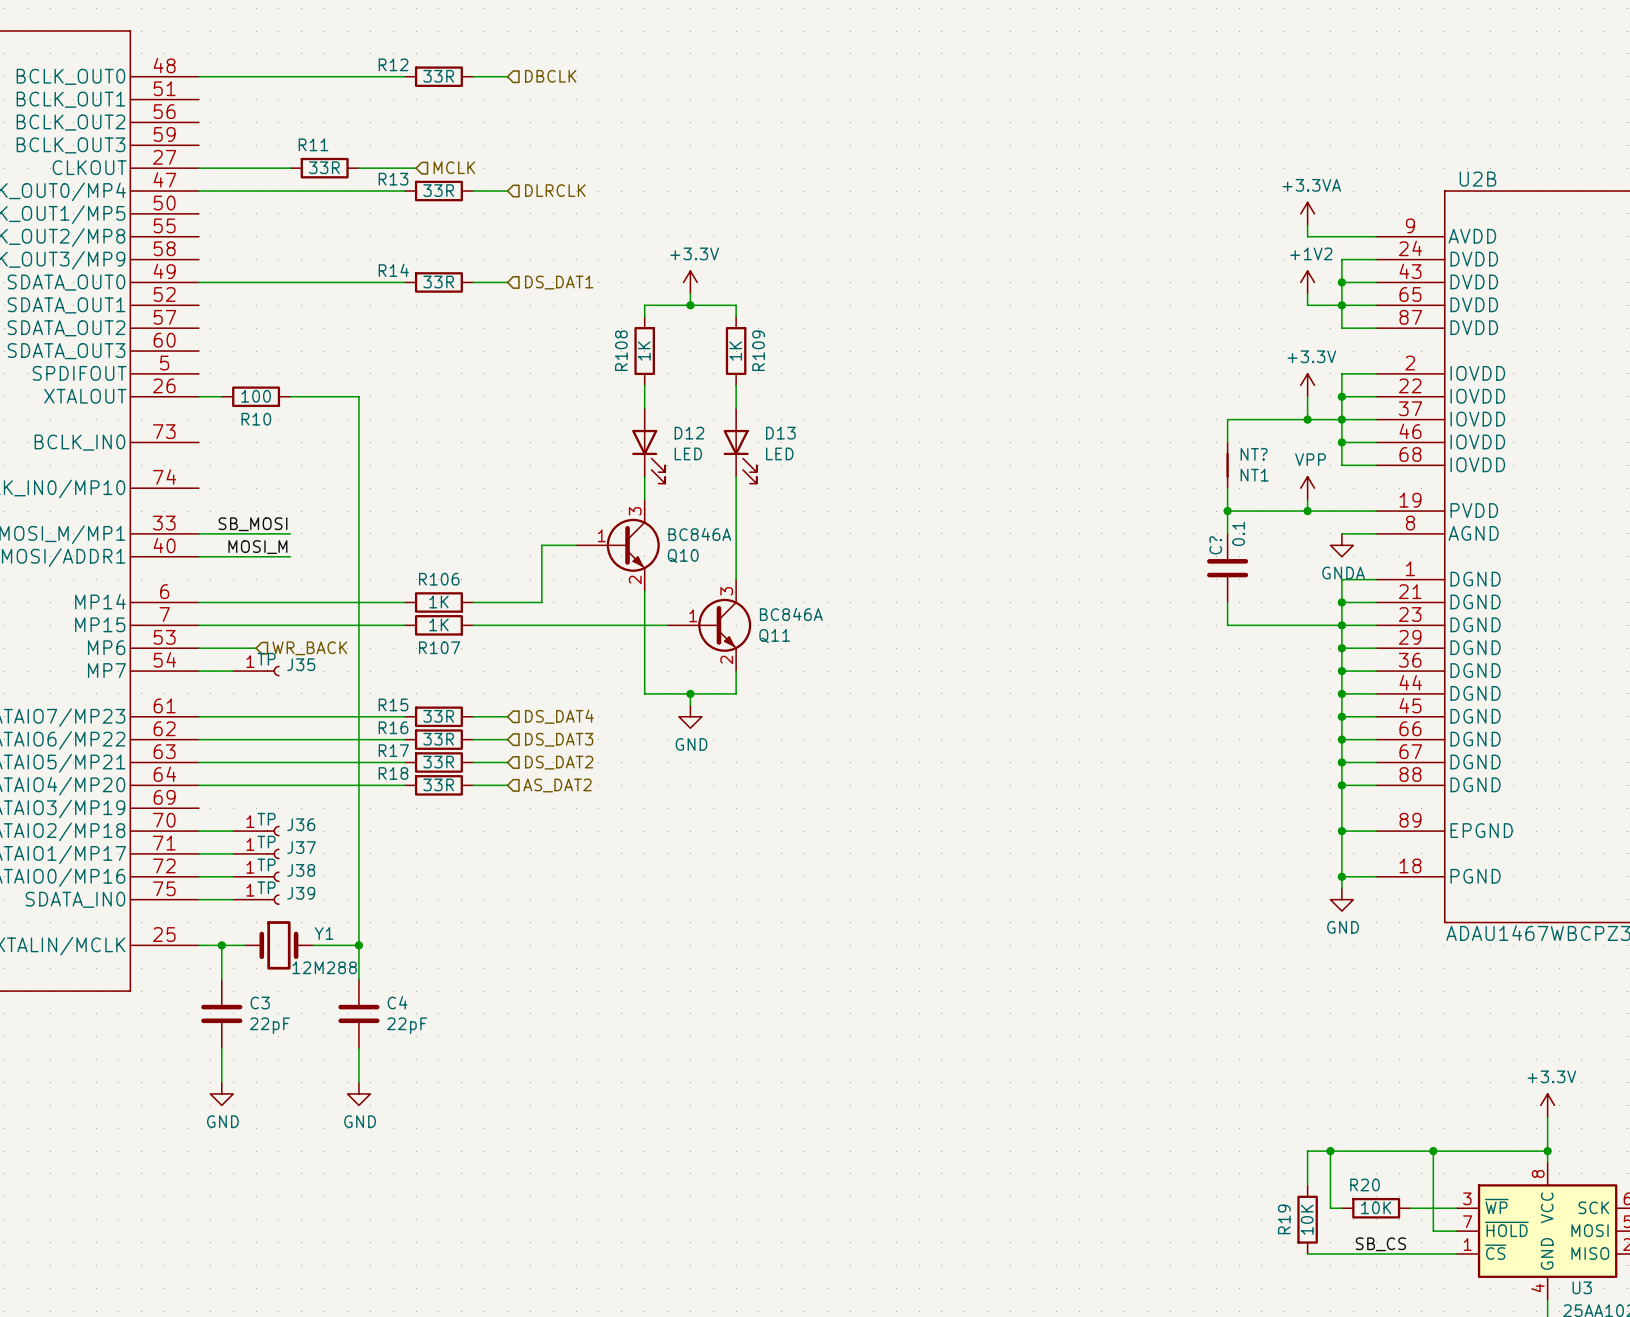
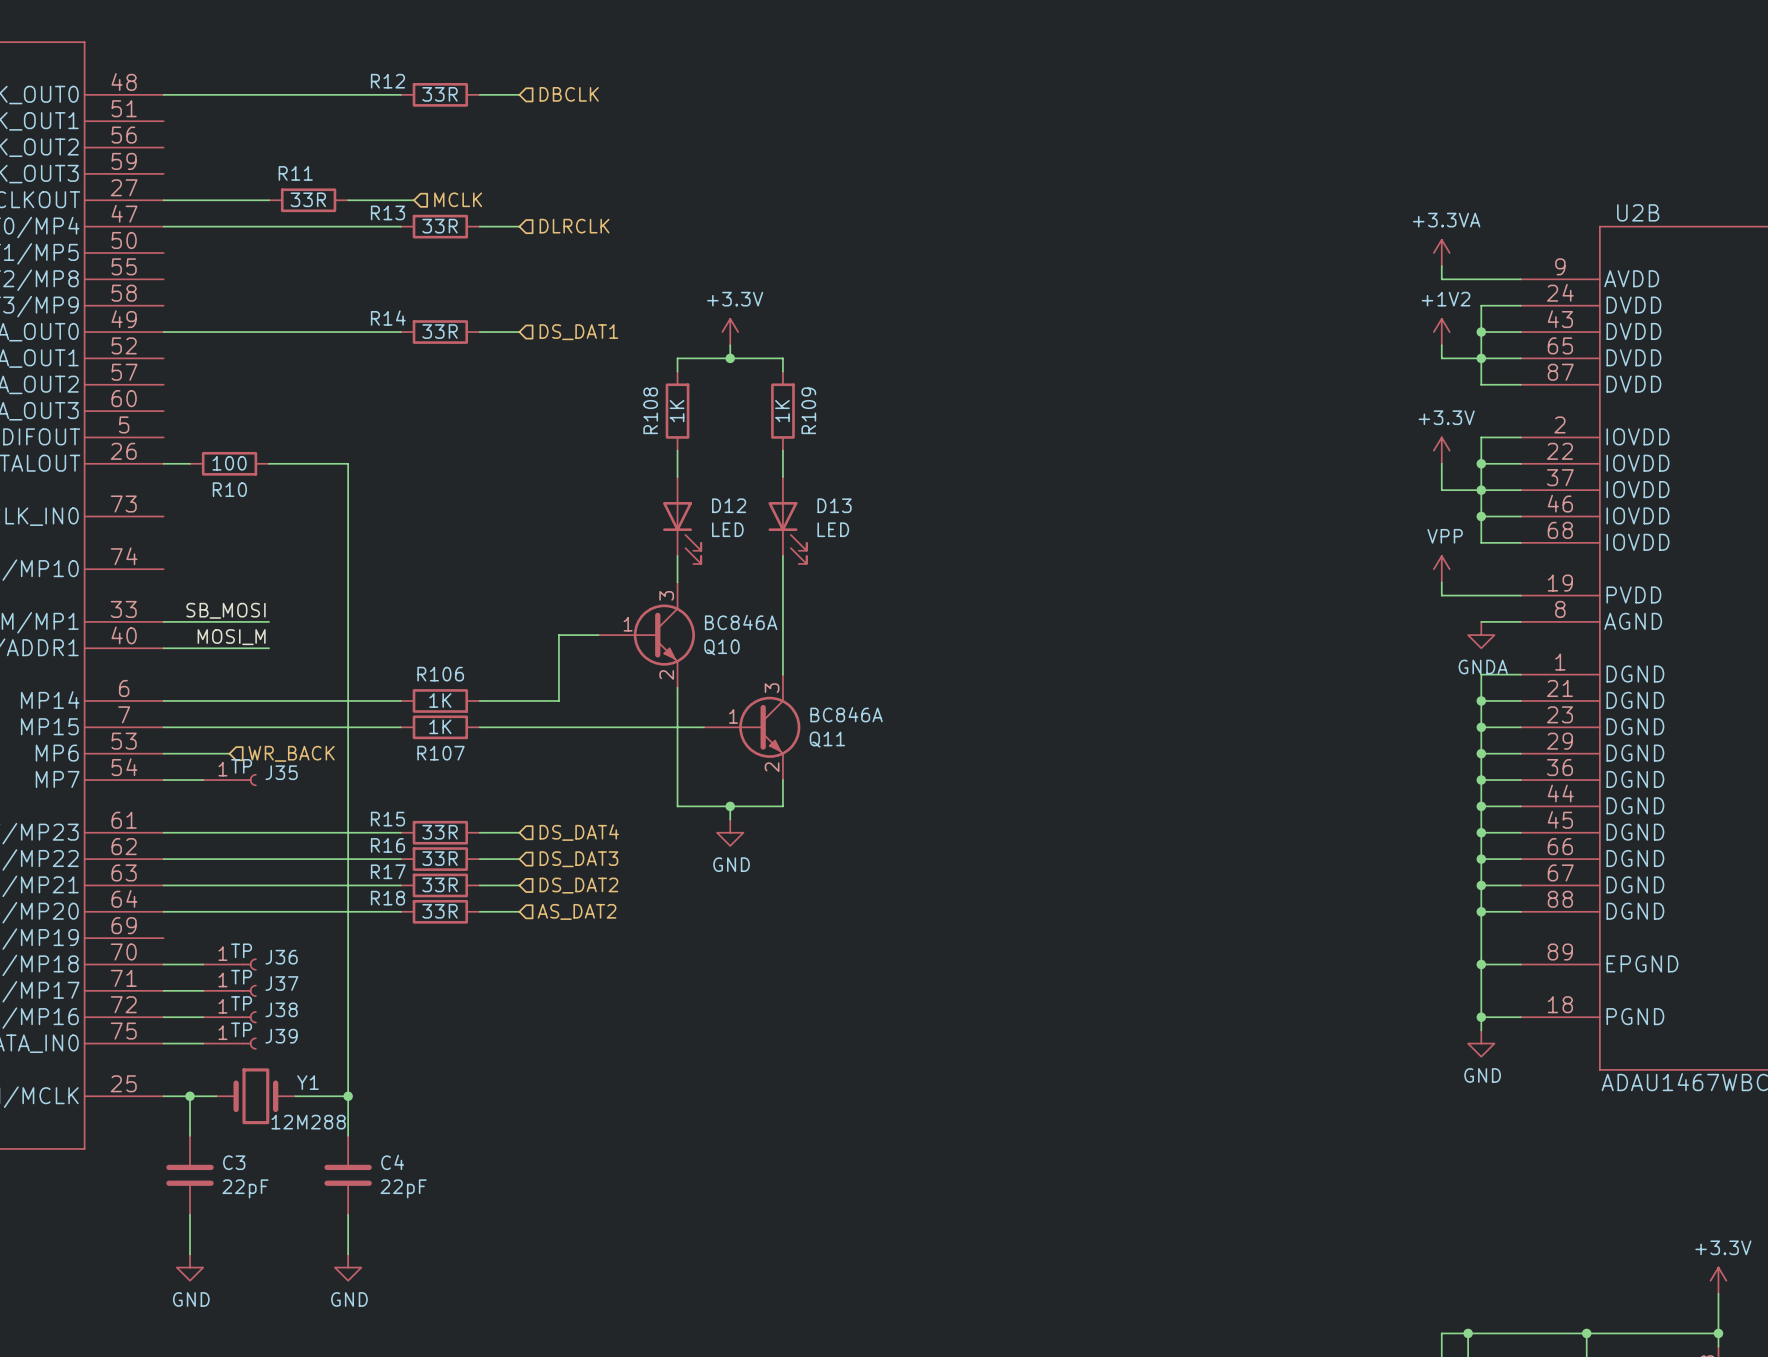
wire: (1307, 419) (1227, 419) (1227, 442) -> none
junction: (1307, 419) -> none
NT?: NT1 (1227, 465) -> none
wire: (1227, 488) (1227, 533) -> none
wire: (1227, 511) (1307, 511) -> none
junction: (1227, 511) -> none
junction: (1307, 511) -> none
C?: 0.1 (1227, 568) -> none
wire: (1227, 602) (1227, 625) (1341, 625) -> none

